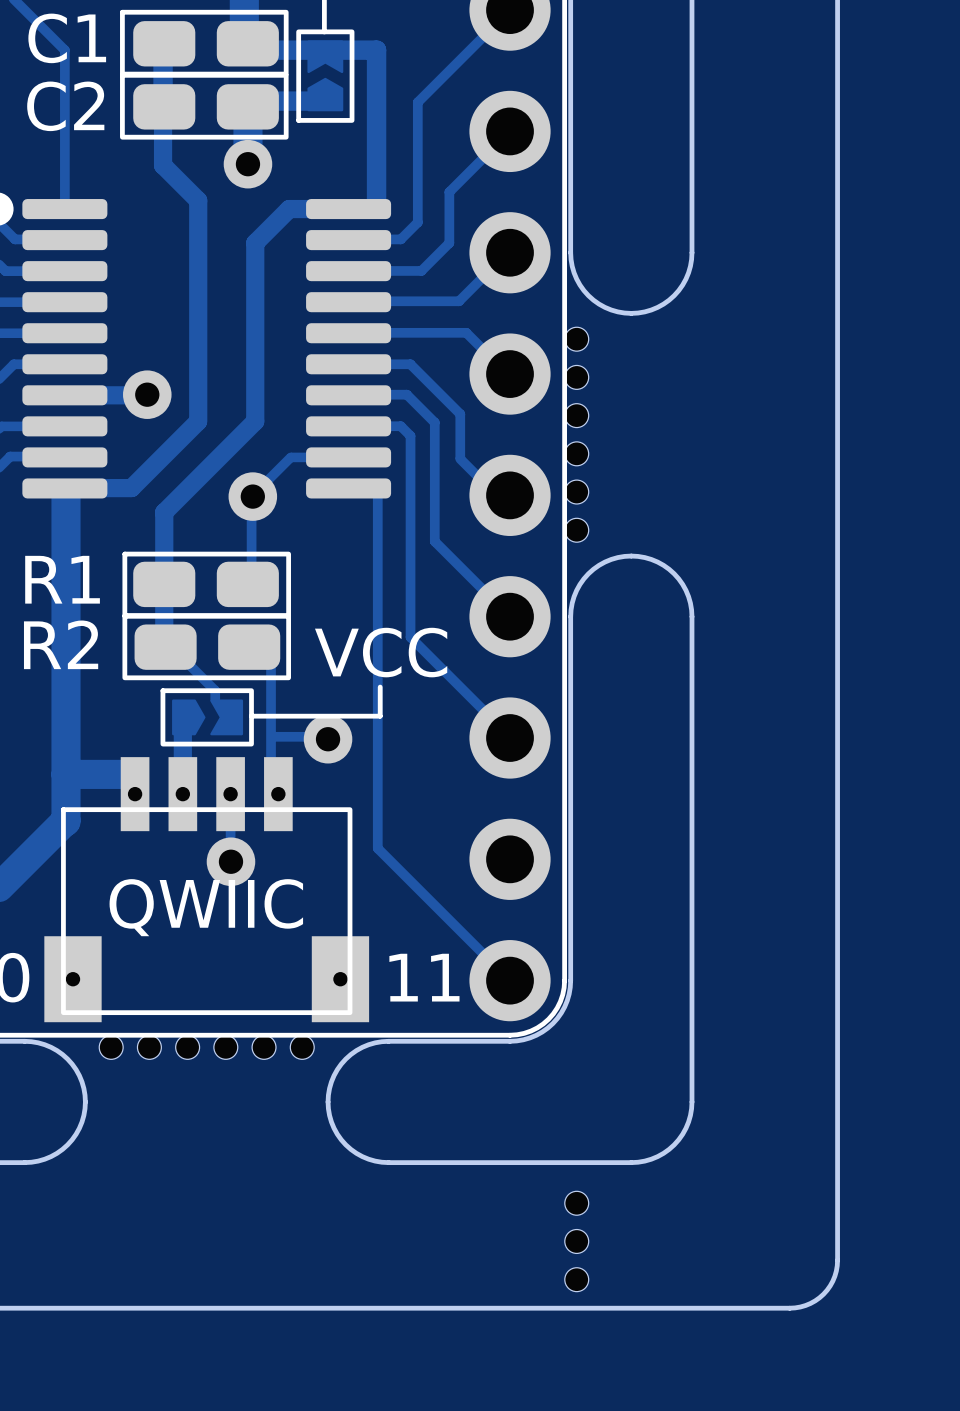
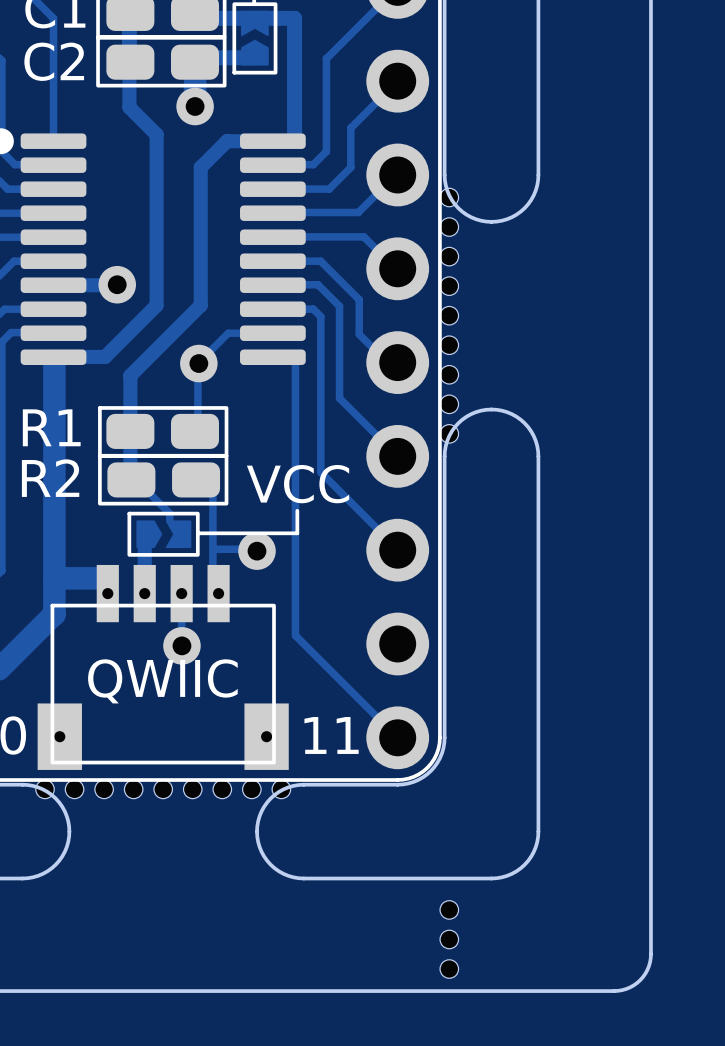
part footprint: [564, 327, 589, 543] -> [440, 188, 459, 444]
part footprint: [99, 1035, 315, 1060] -> [35, 780, 291, 799]

